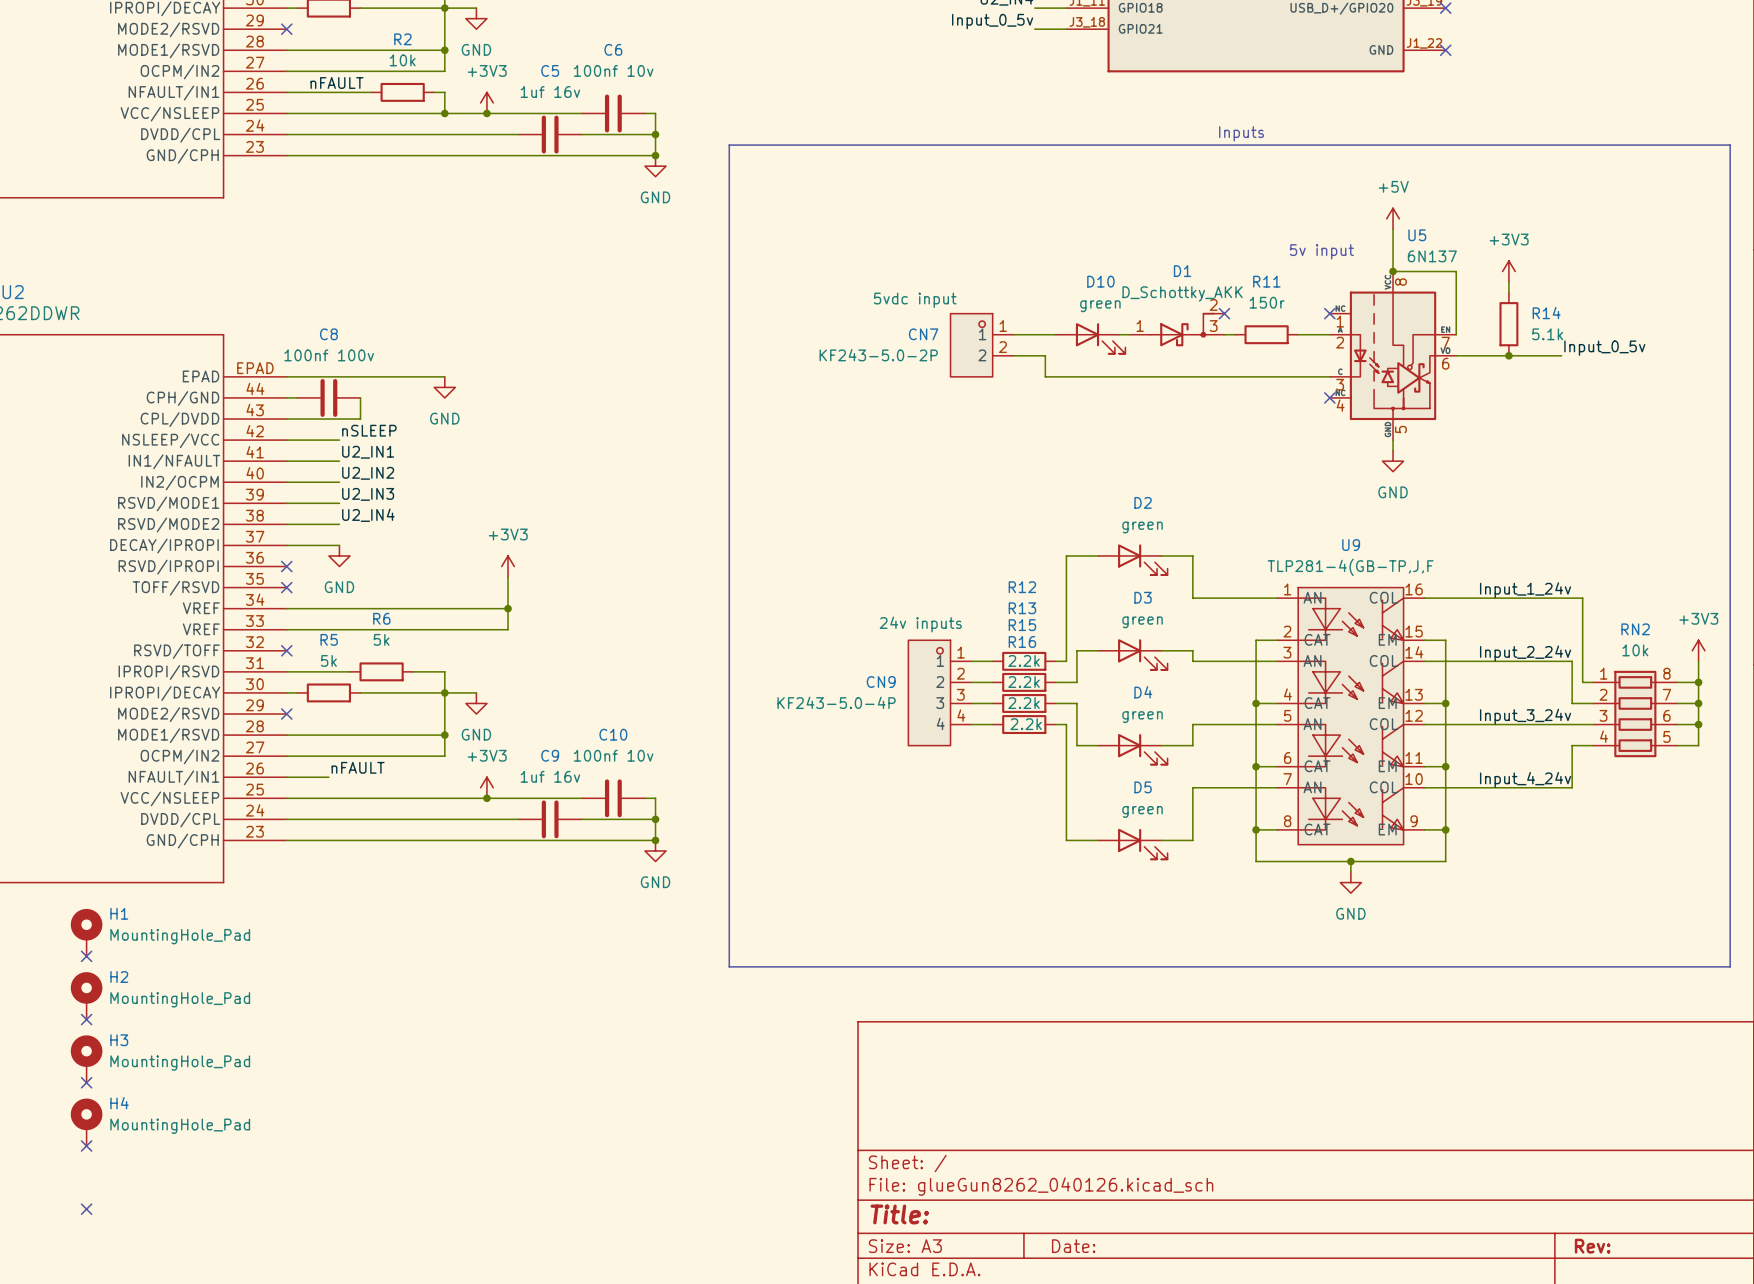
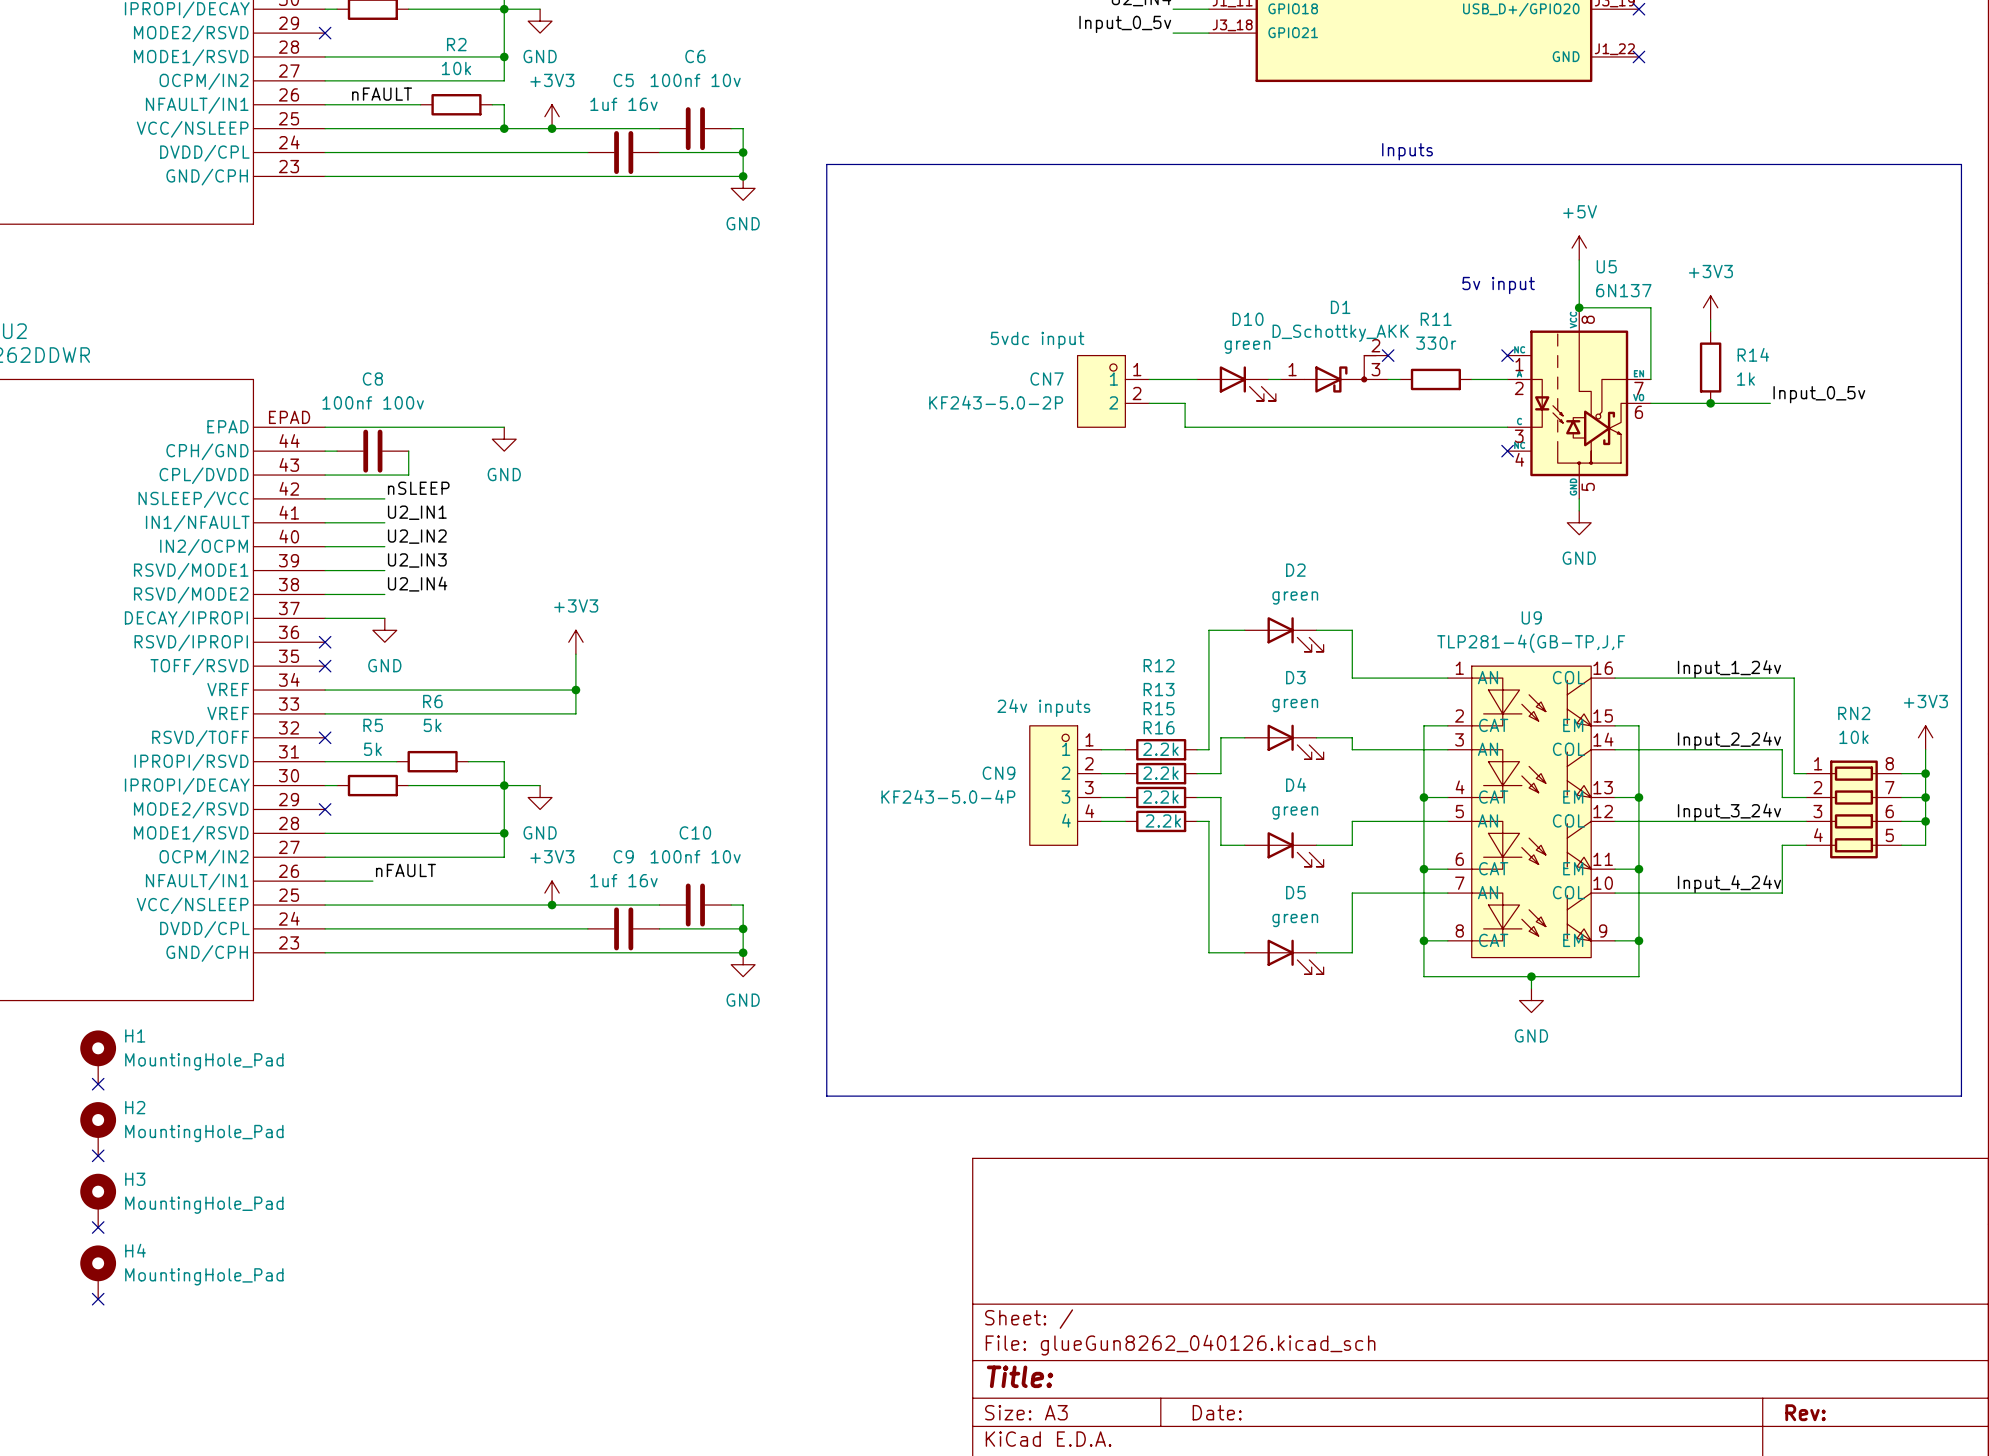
R11 value: 150r (1267, 302) -> 330r (1436, 343)
R14 value: 5.1k (1547, 334) -> 1k (1745, 379)
no-connect mark: (86, 1209) -> none

